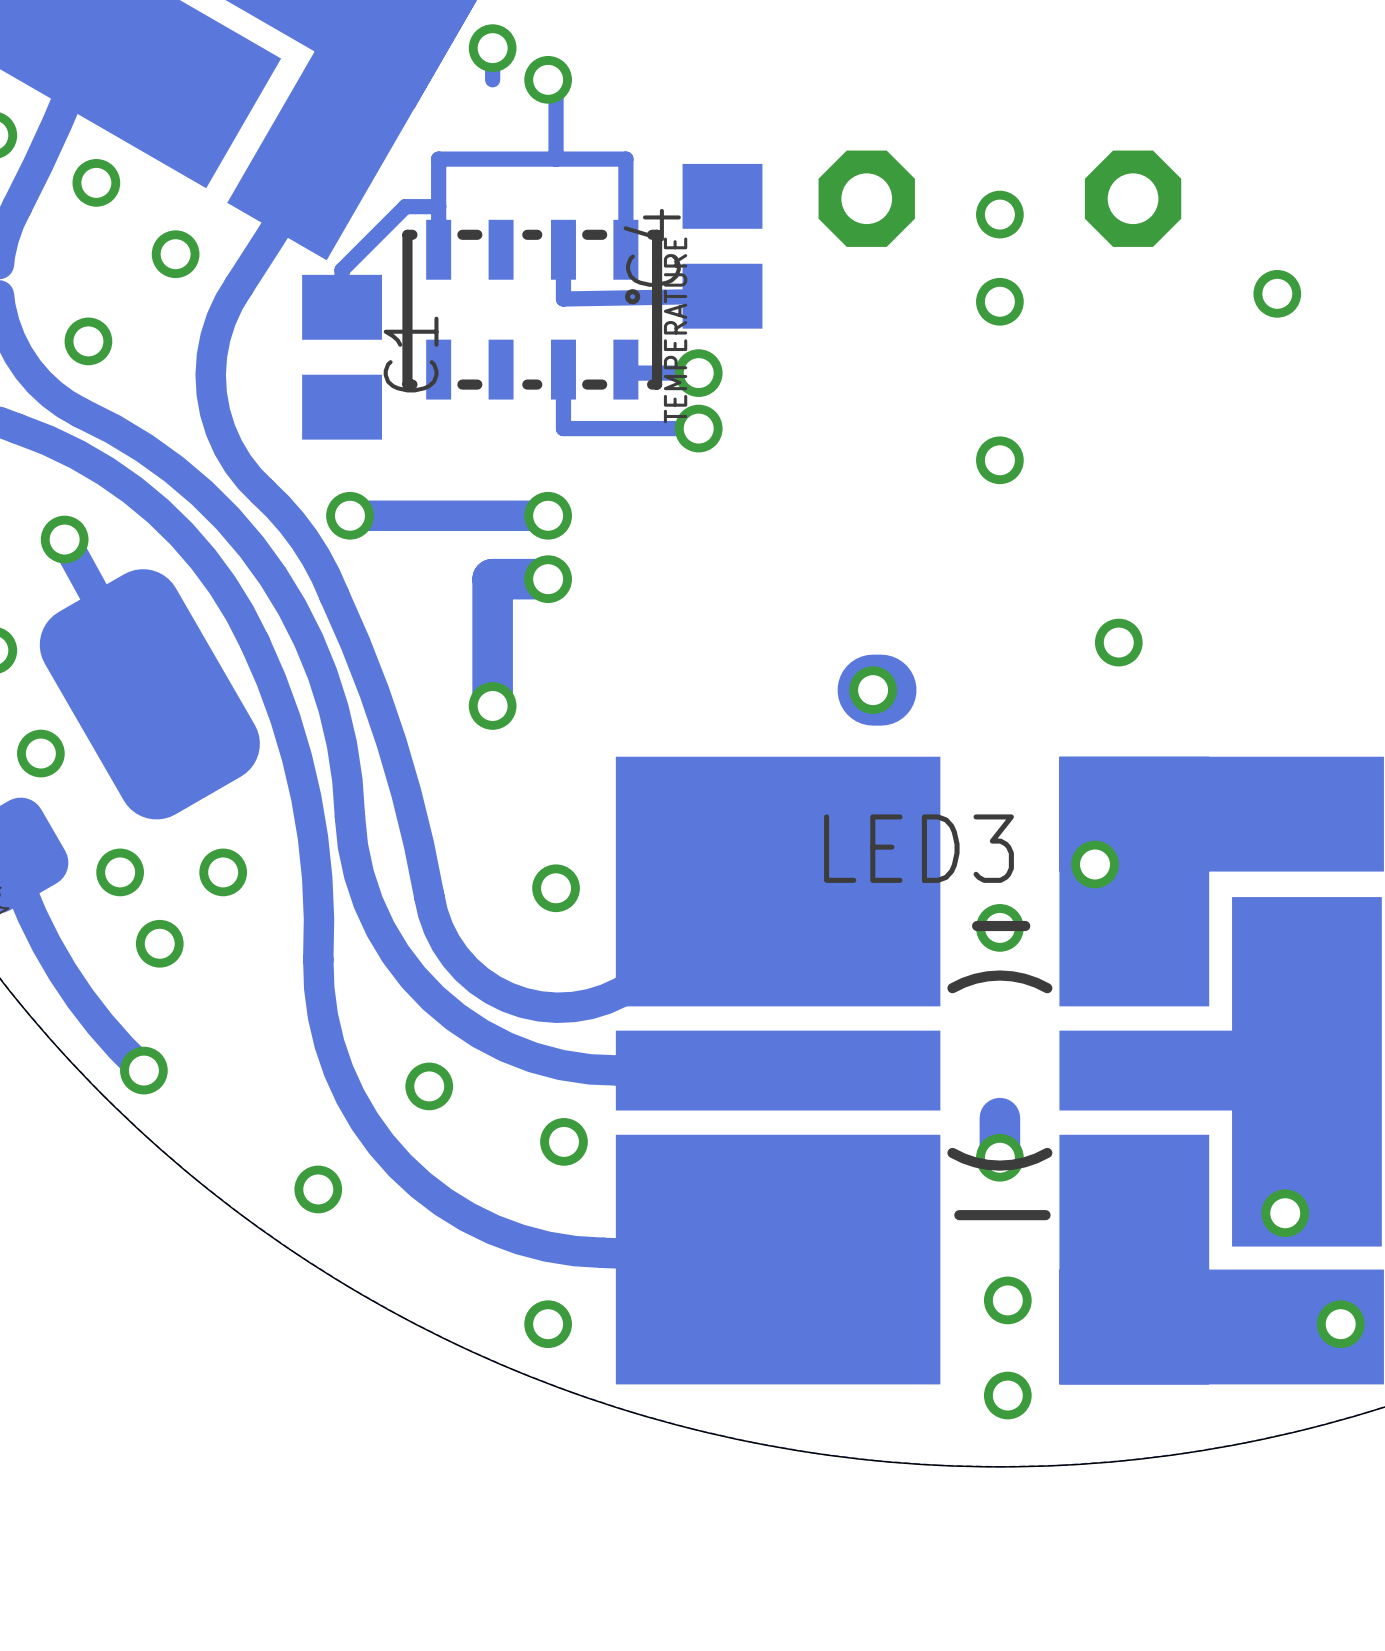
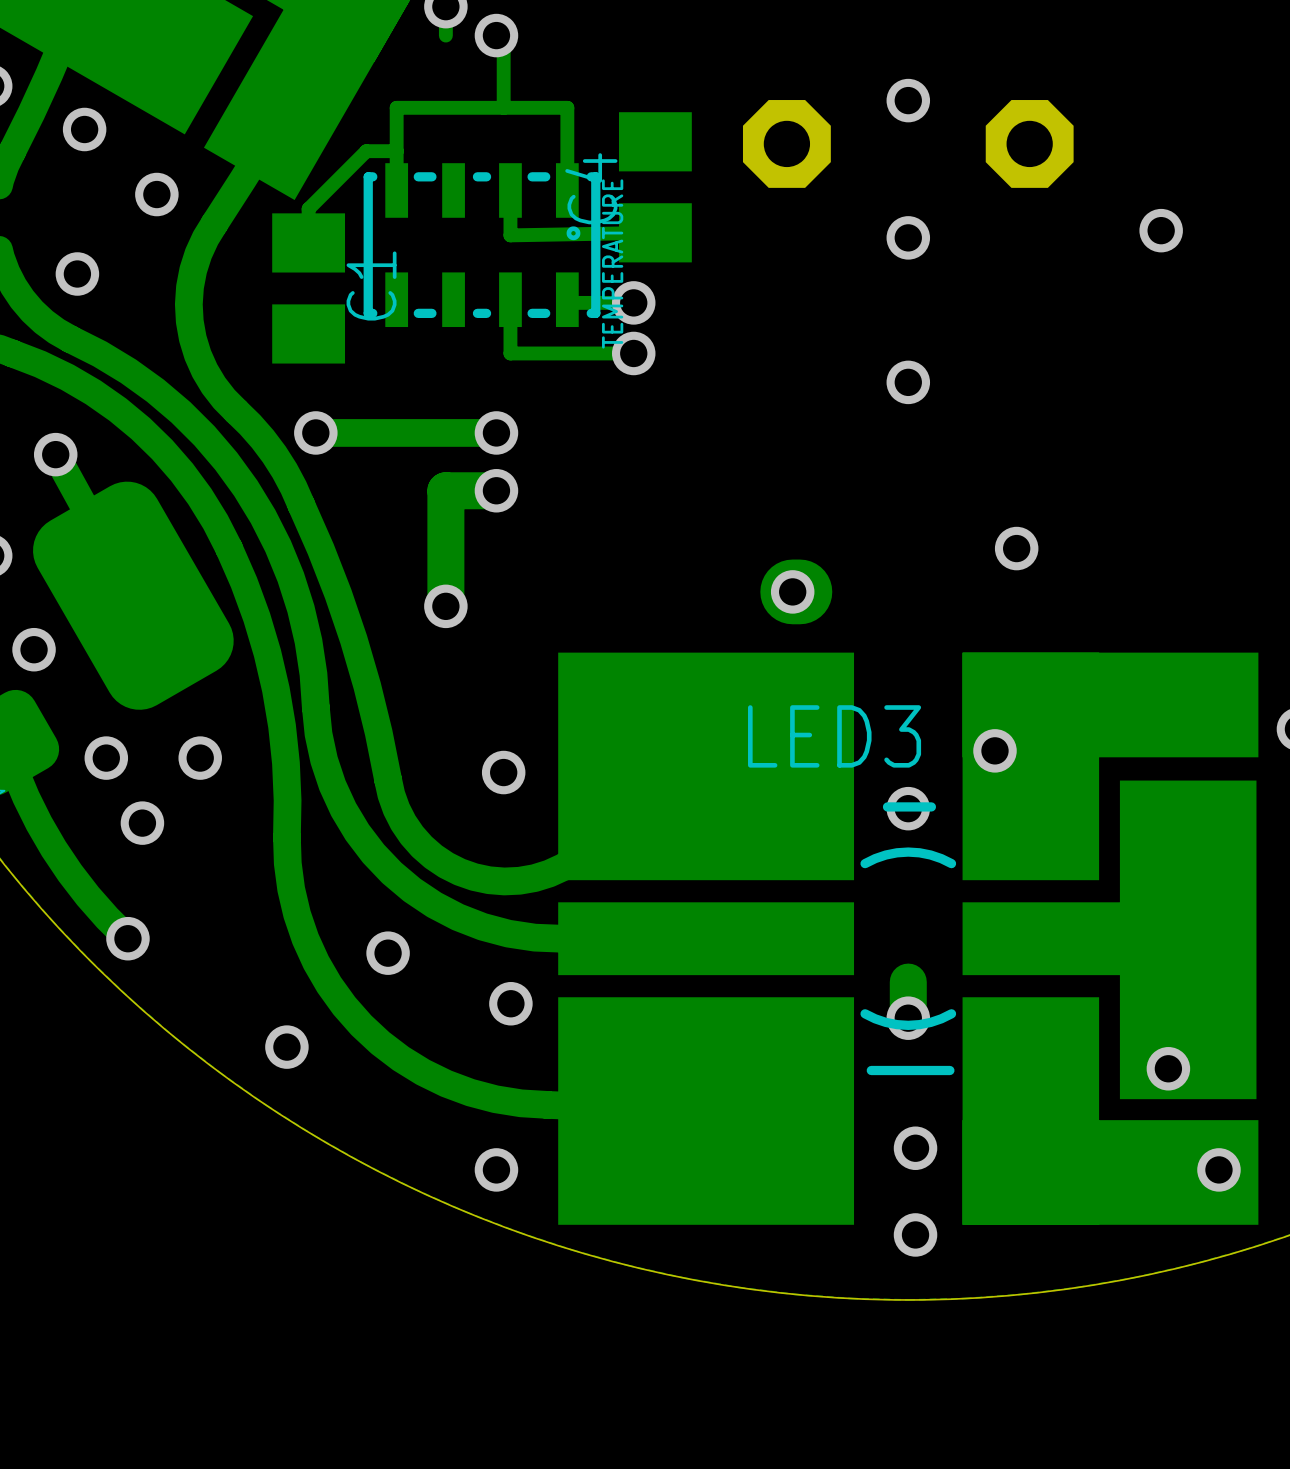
via position: (999, 214) -> (908, 100)

